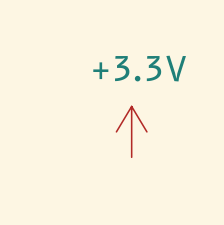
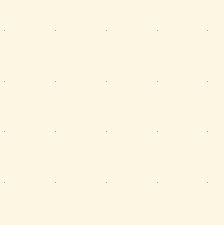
power symbol: +3.3V (131, 131) -> none

